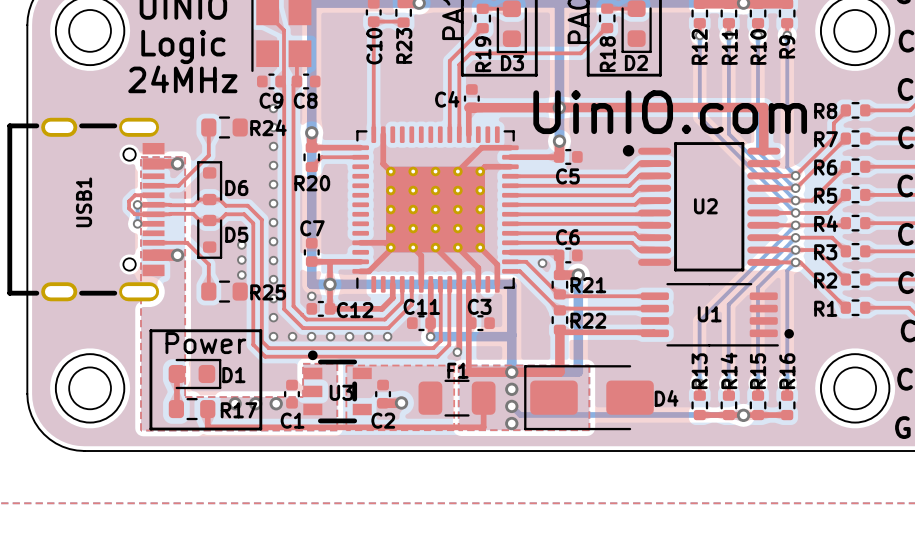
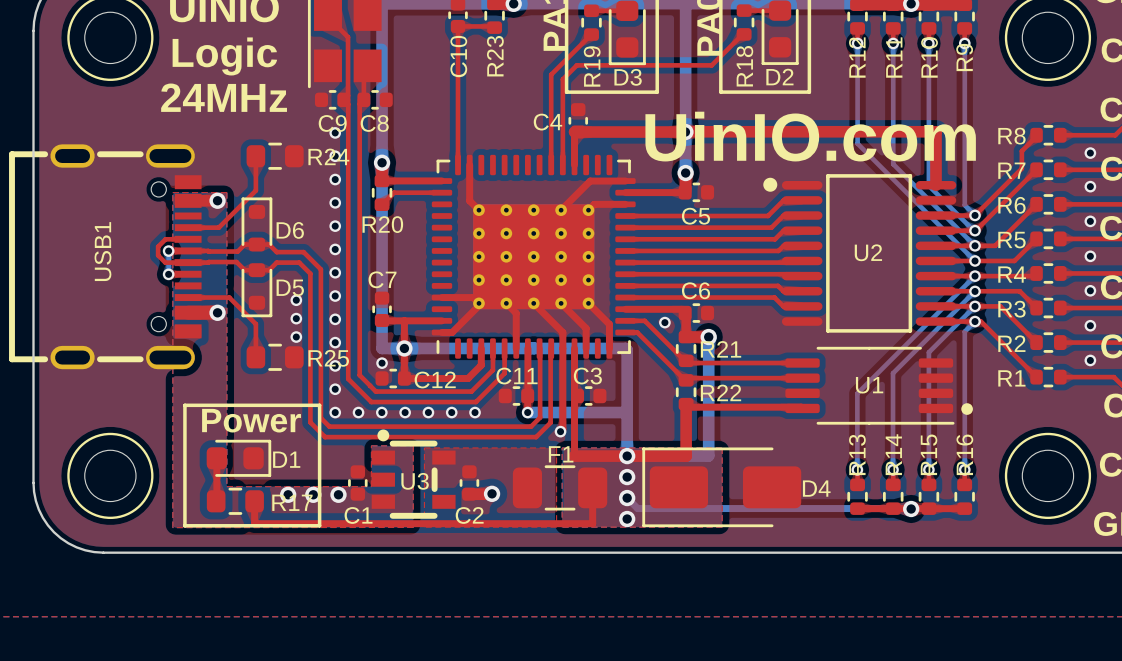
via: none -> (1090, 153)
via: none -> (1090, 186)
via: none -> (1090, 221)
via: none -> (1090, 256)
via: none -> (1090, 290)
via: none -> (1090, 325)
via: none -> (1090, 360)

